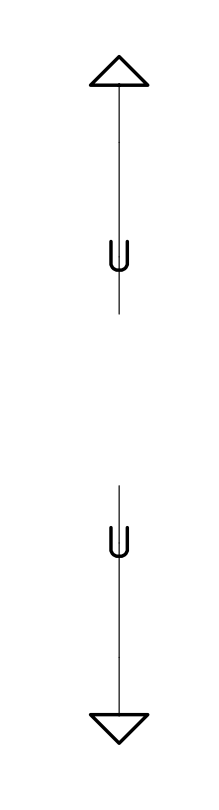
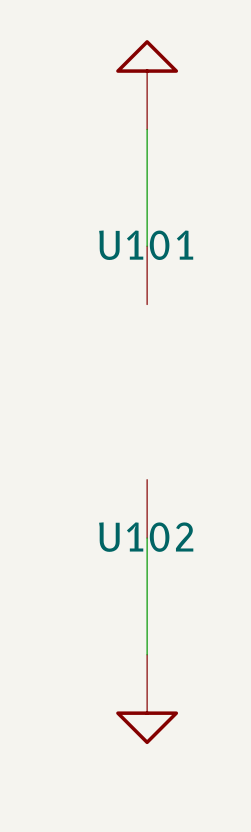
U name: U (119, 255) -> U101 (146, 245)
U name: U (119, 541) -> U102 (146, 537)

